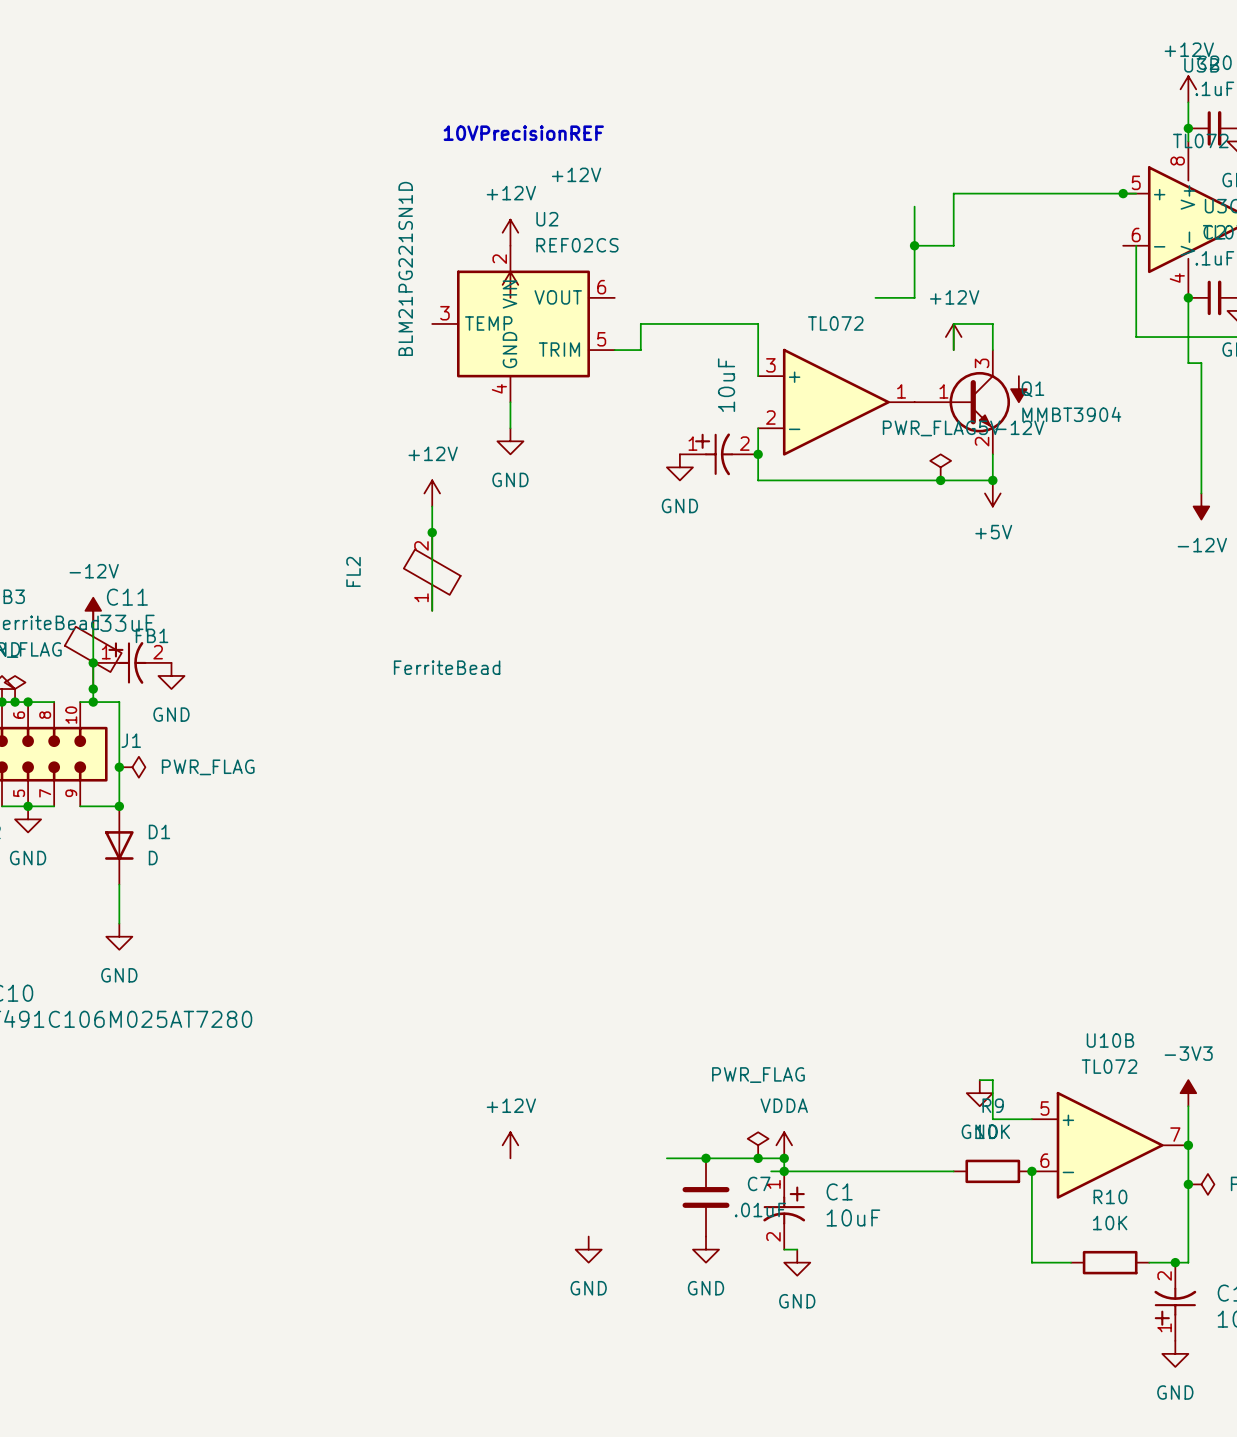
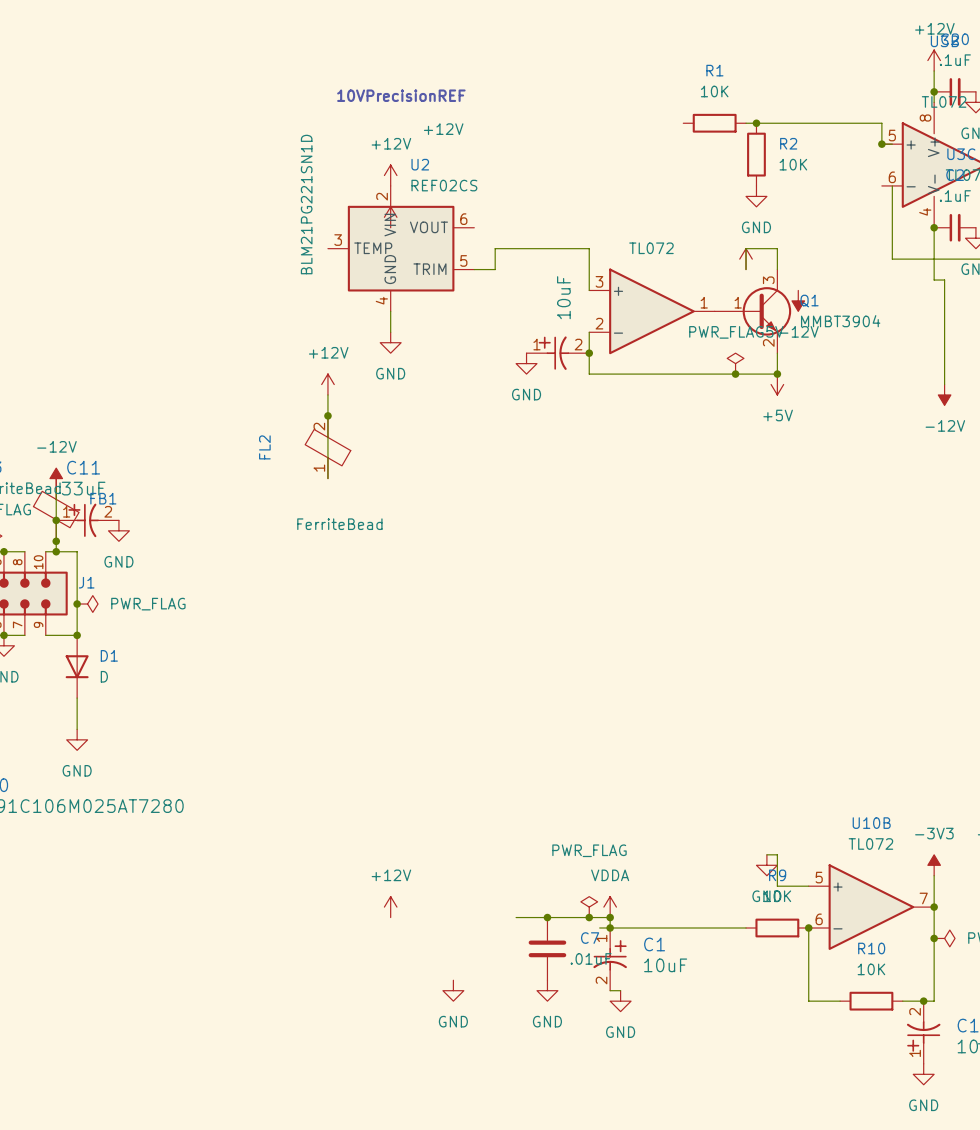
R1: none -> 10K (714, 123)
junction: none -> (756, 123)
wire: (1123, 193) (953, 193) (953, 245) (914, 245) -> (881, 144) (881, 123) (746, 123)
wire: (914, 206) (914, 297) (875, 297) -> none
R2: none -> 10K (756, 154)
junction: (914, 245) -> none
power symbol: none -> GND (756, 196)
power symbol text: +12V (954, 297) -> none

